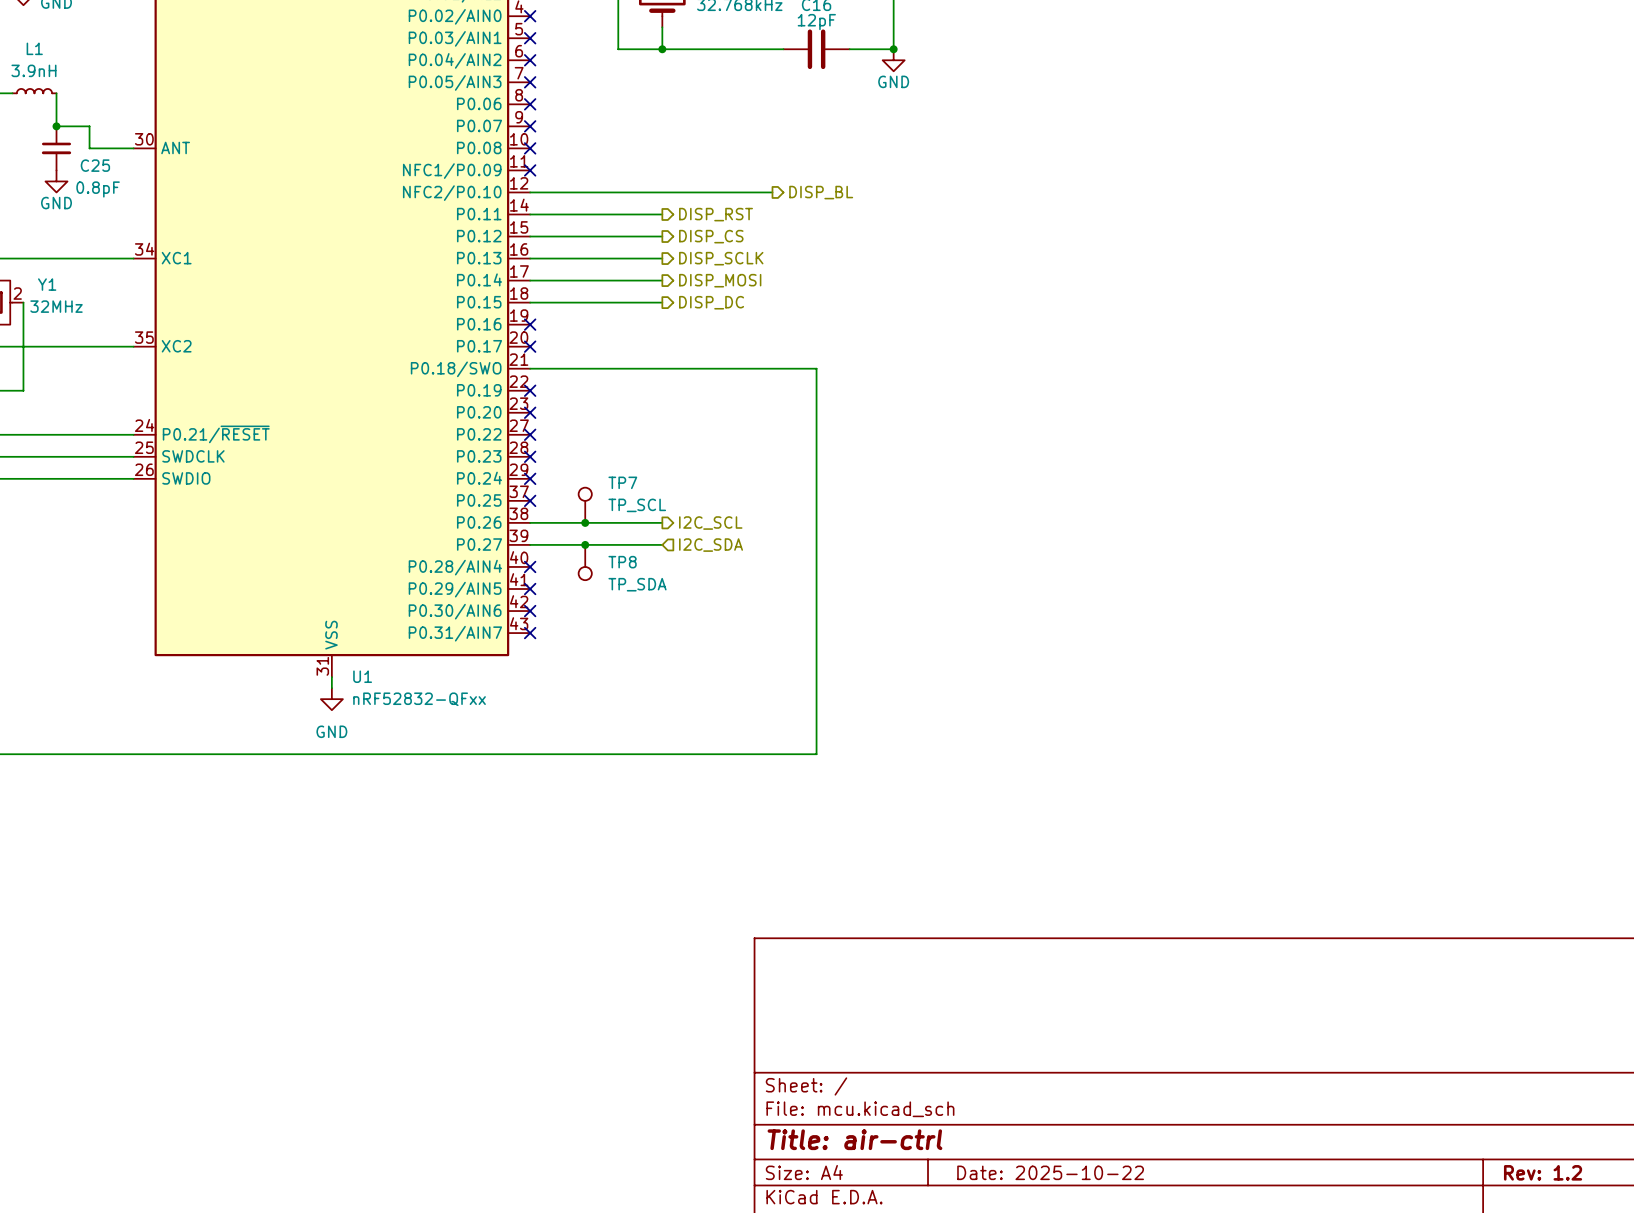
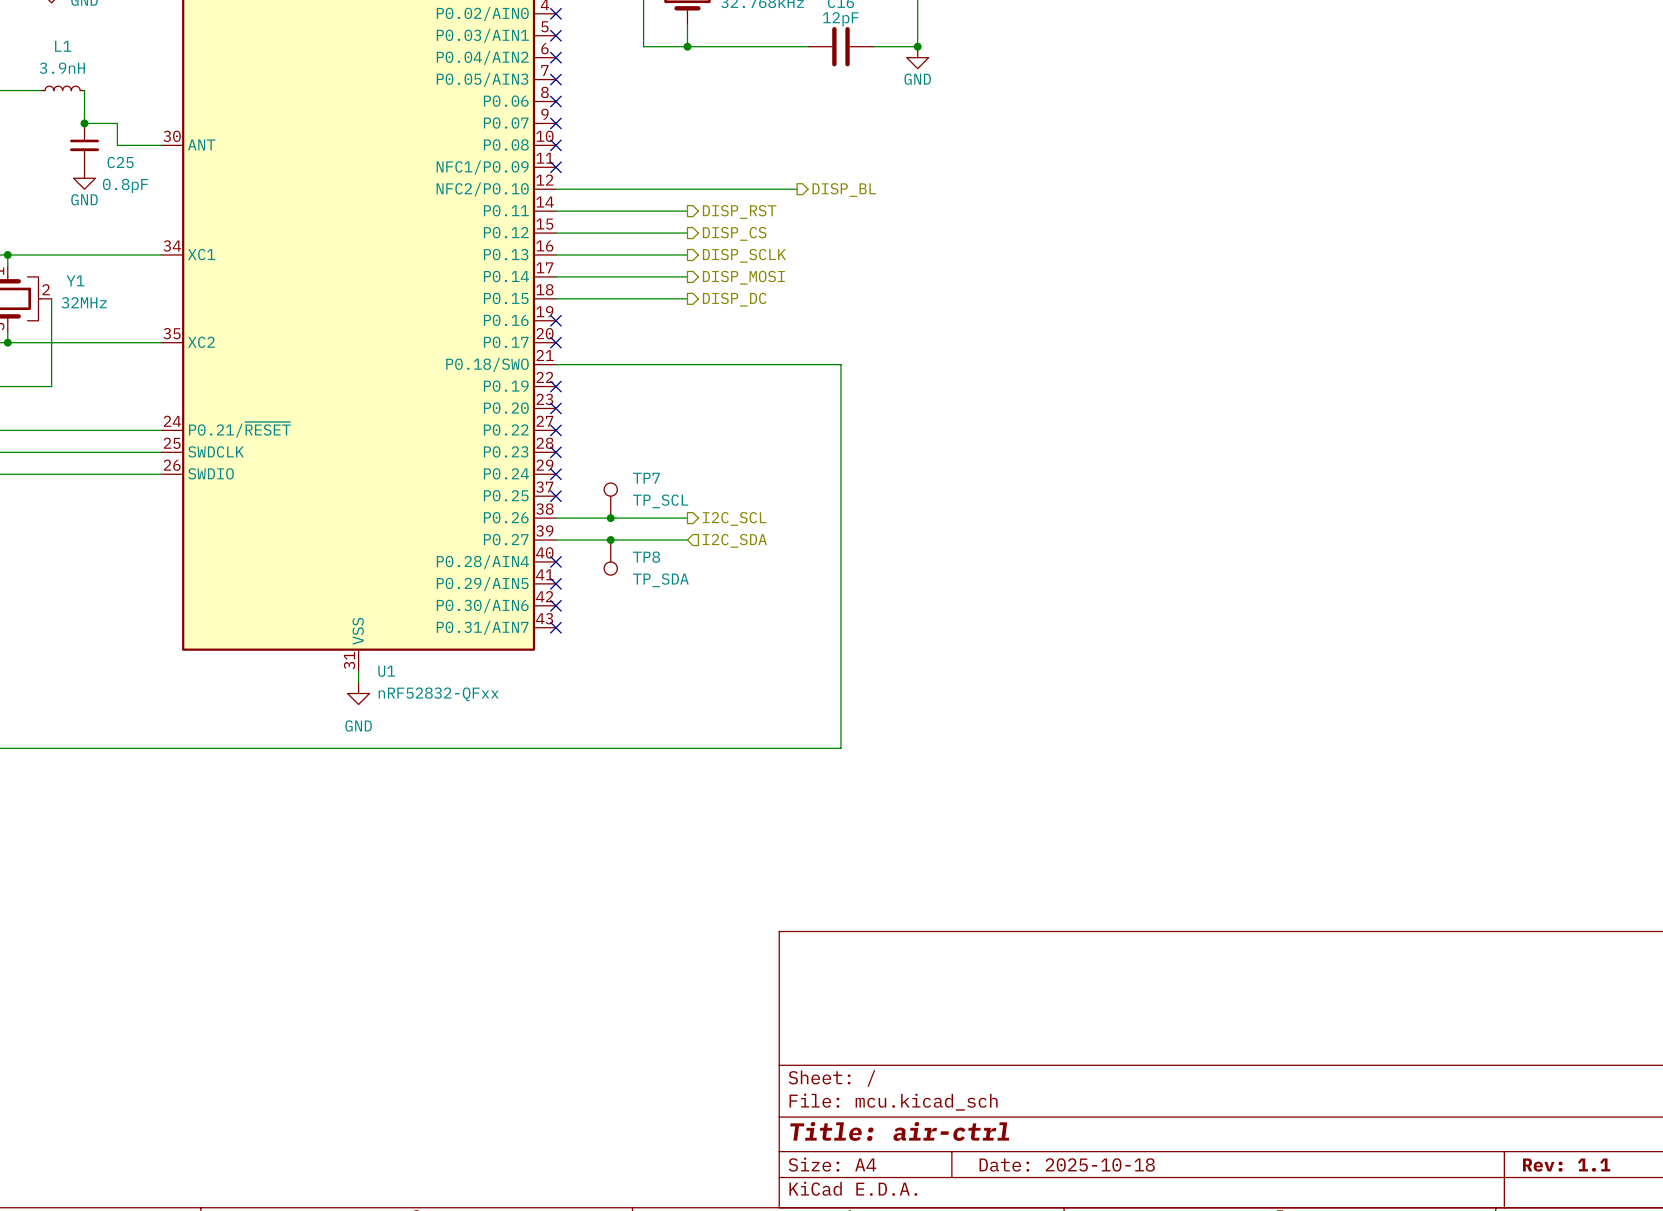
title block: Date: 2025-10-22 (1050, 1172) -> Date: 2025-10-18 (1067, 1164)
title block: Rev: 1.2 (1543, 1172) -> Rev: 1.1 (1566, 1165)

